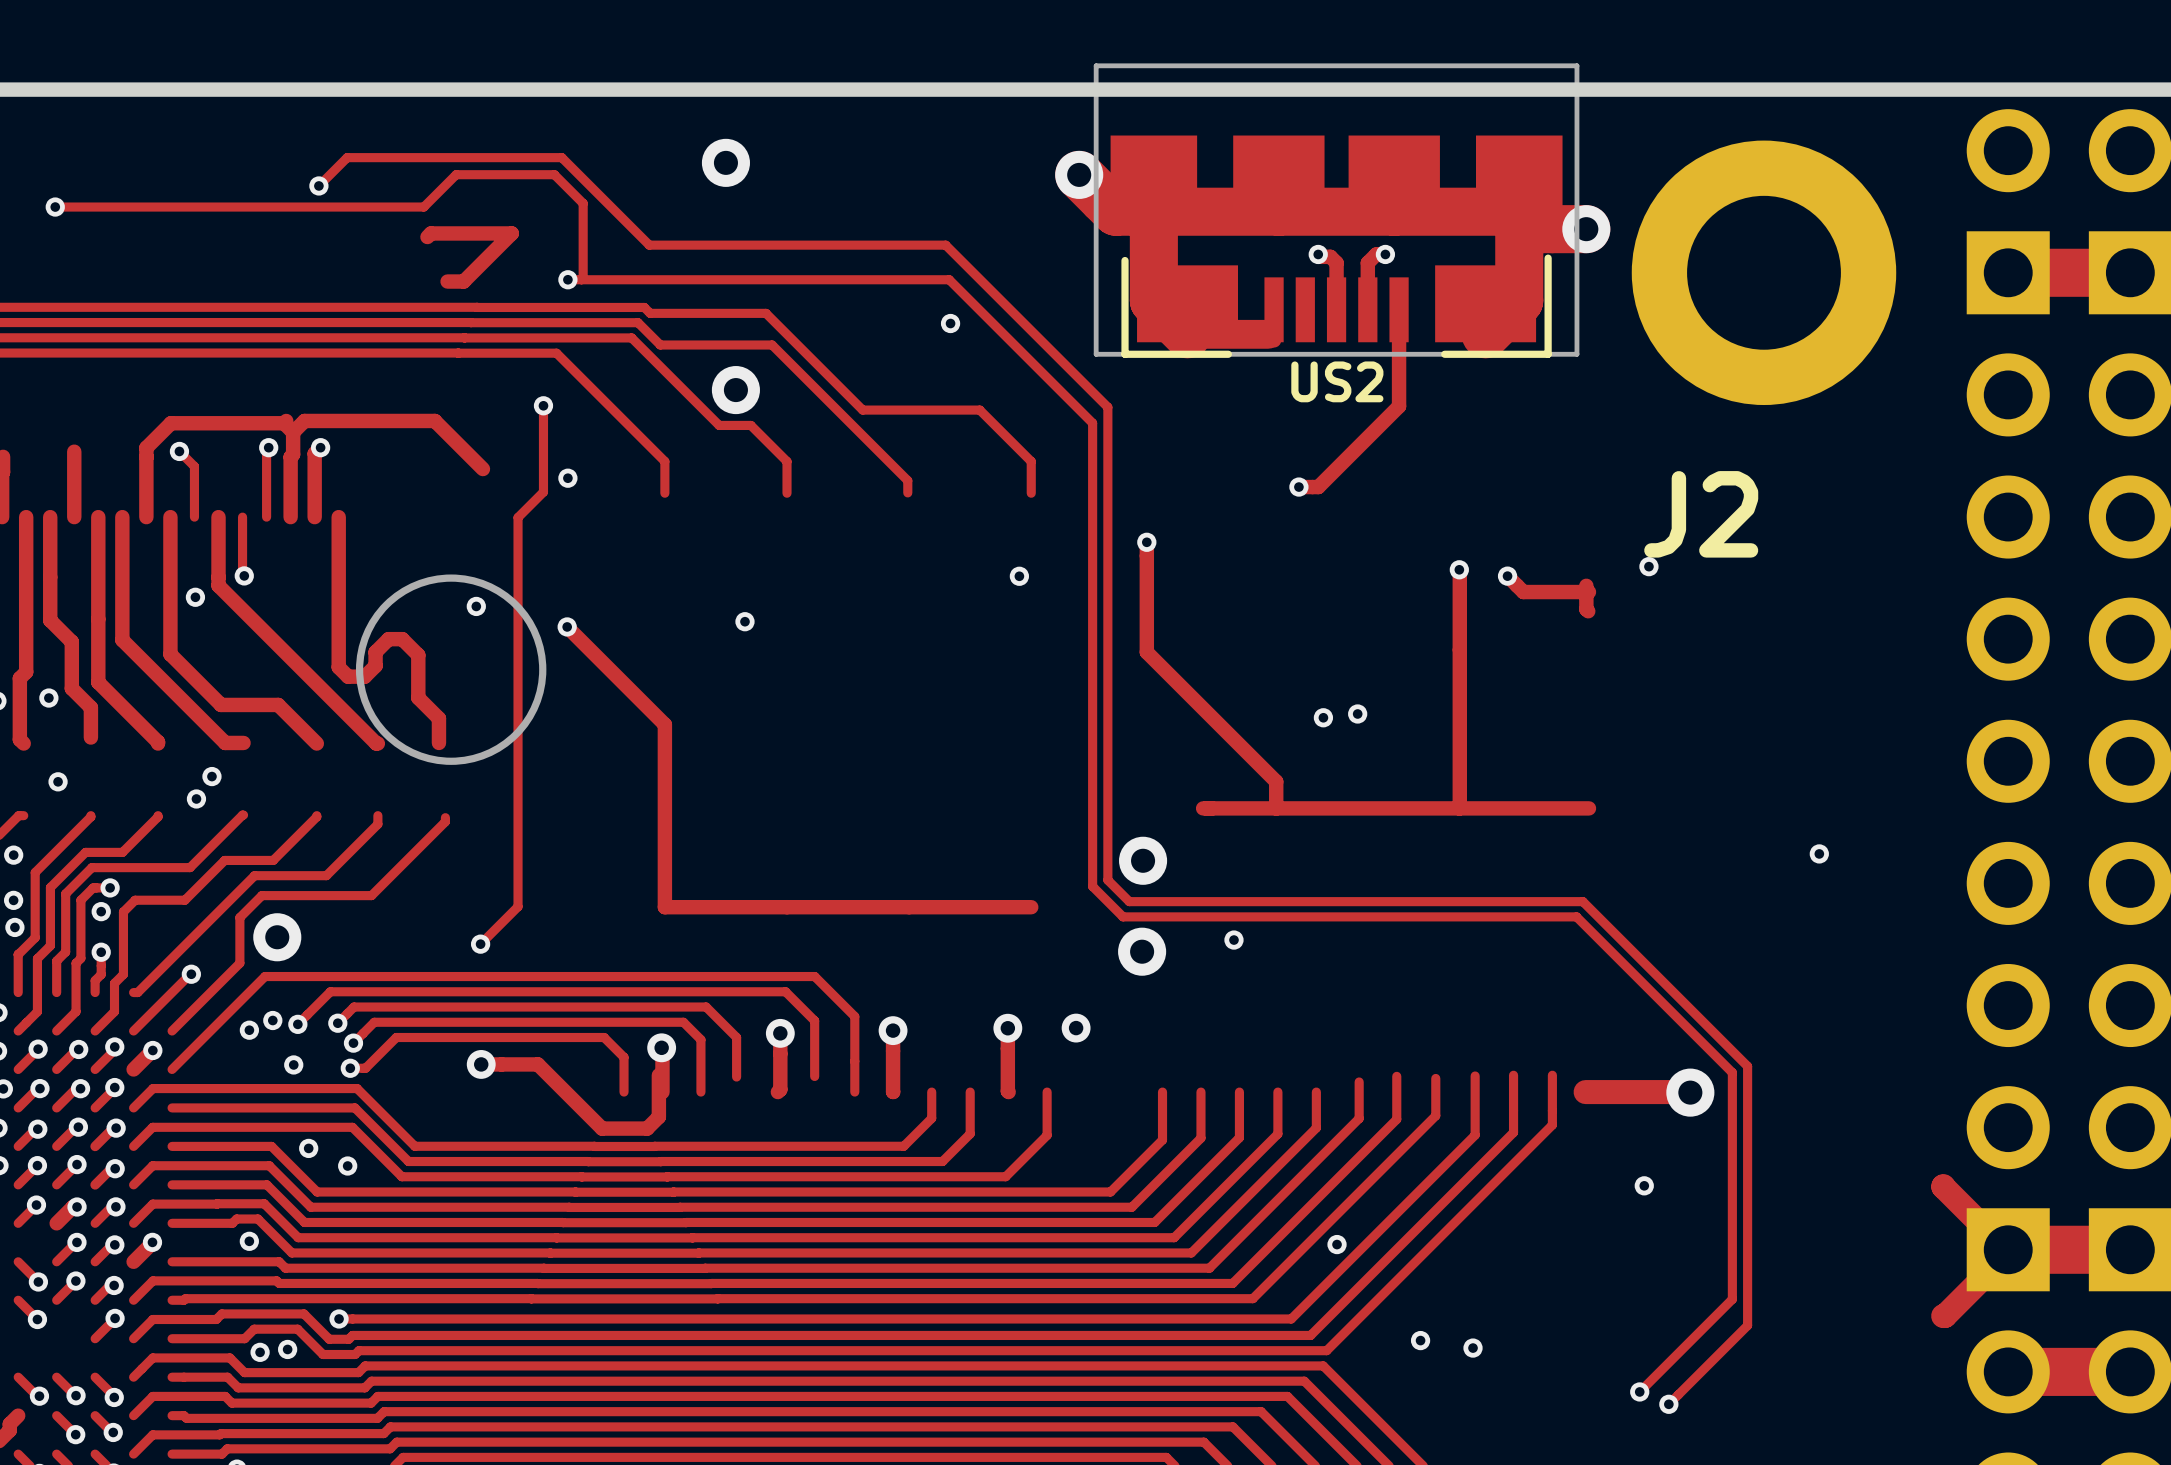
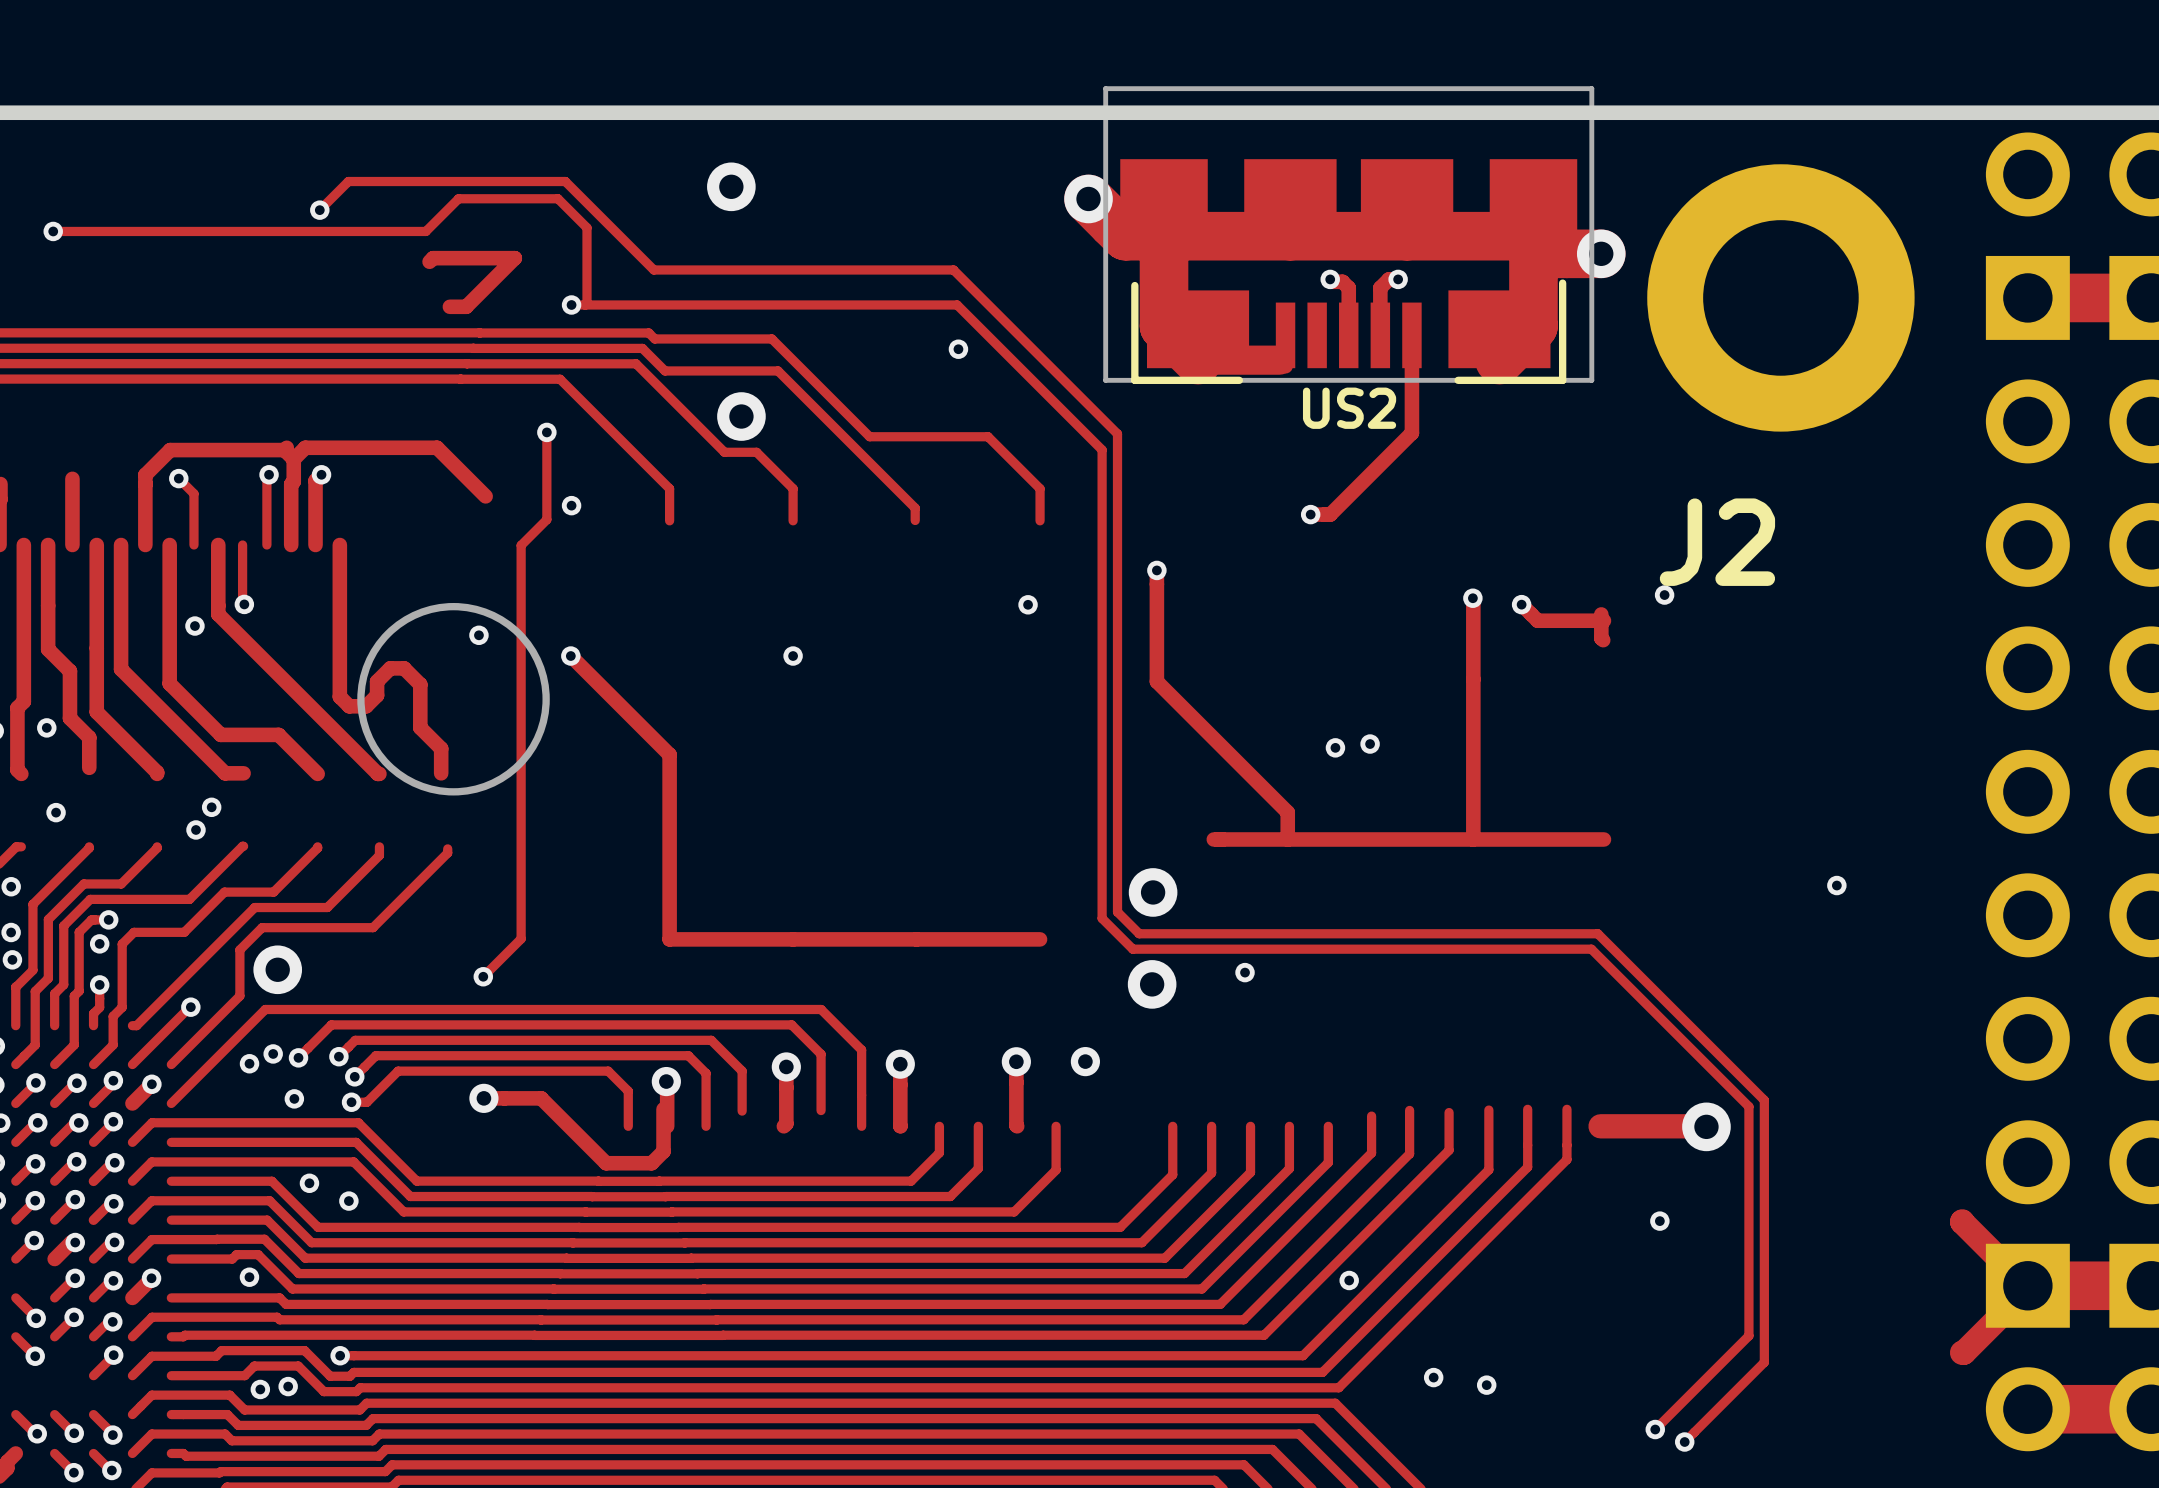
via position: (744, 621) -> (793, 656)

